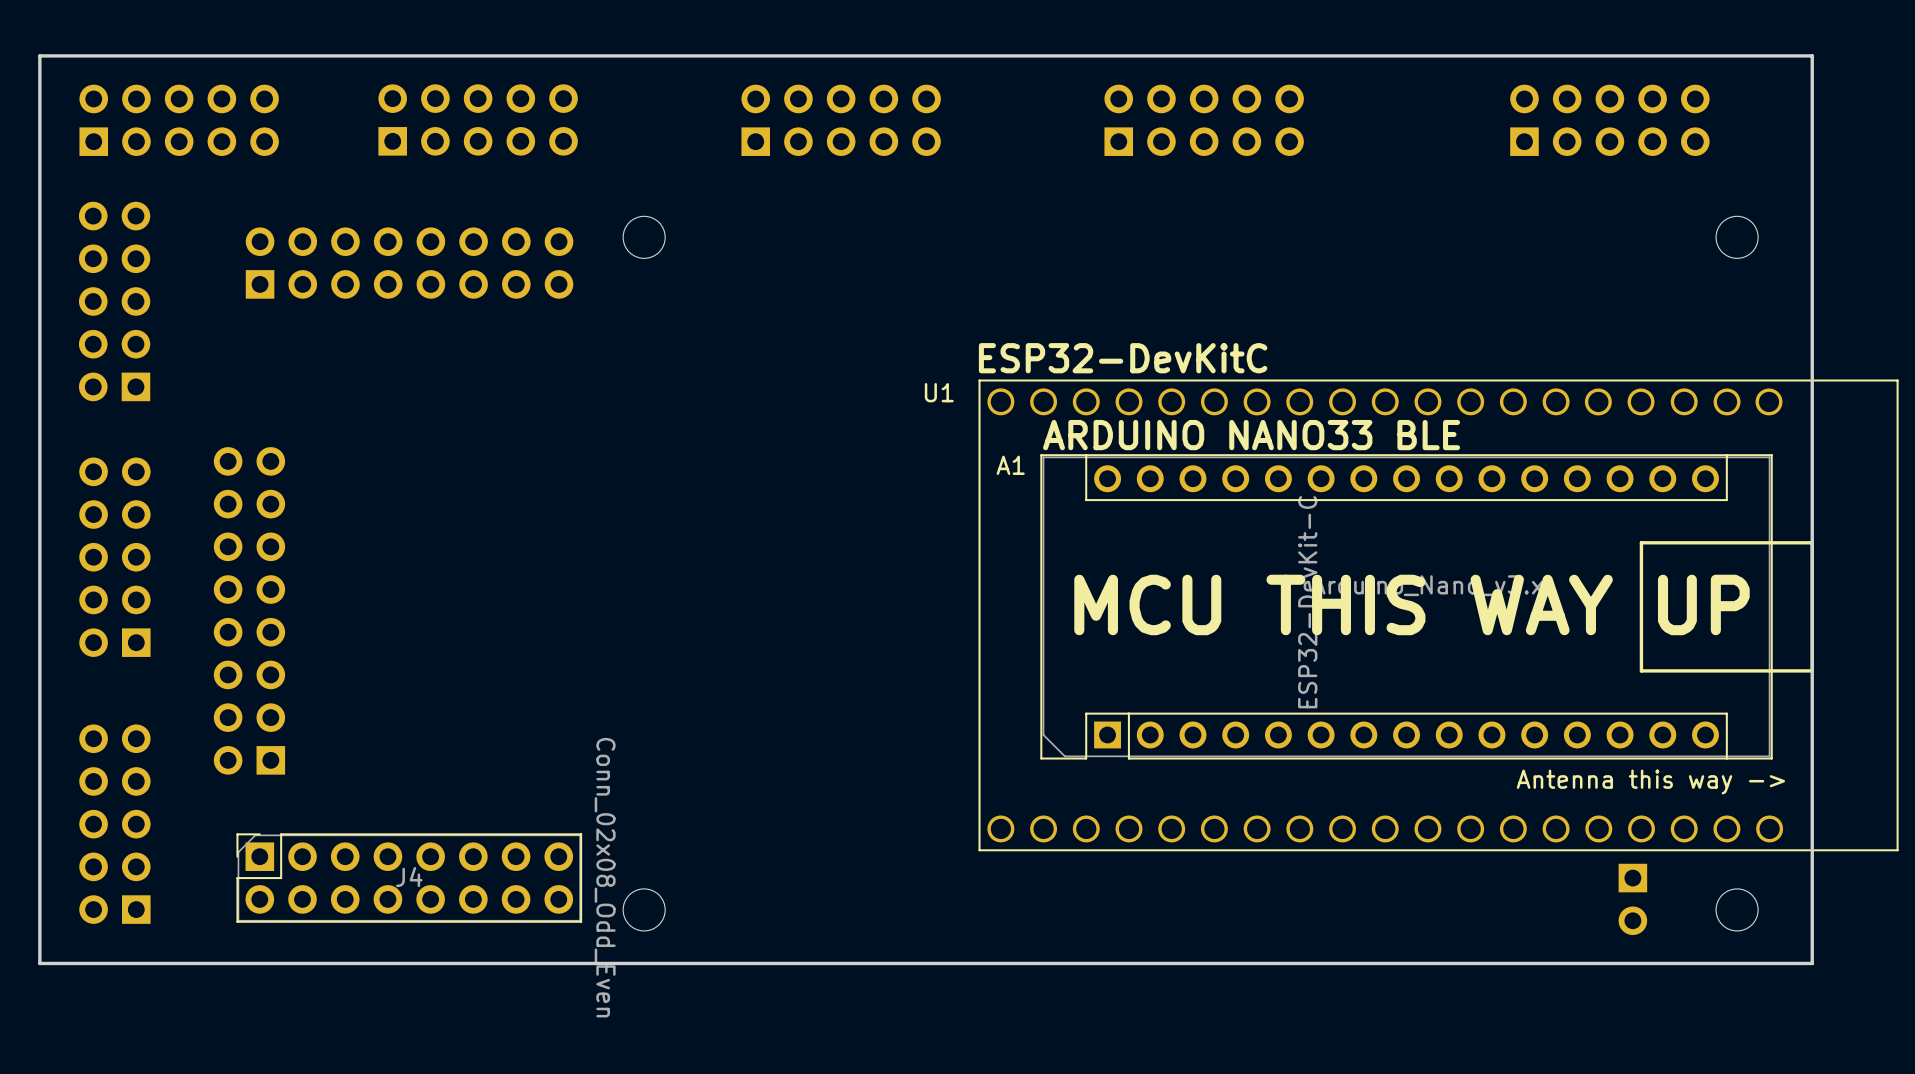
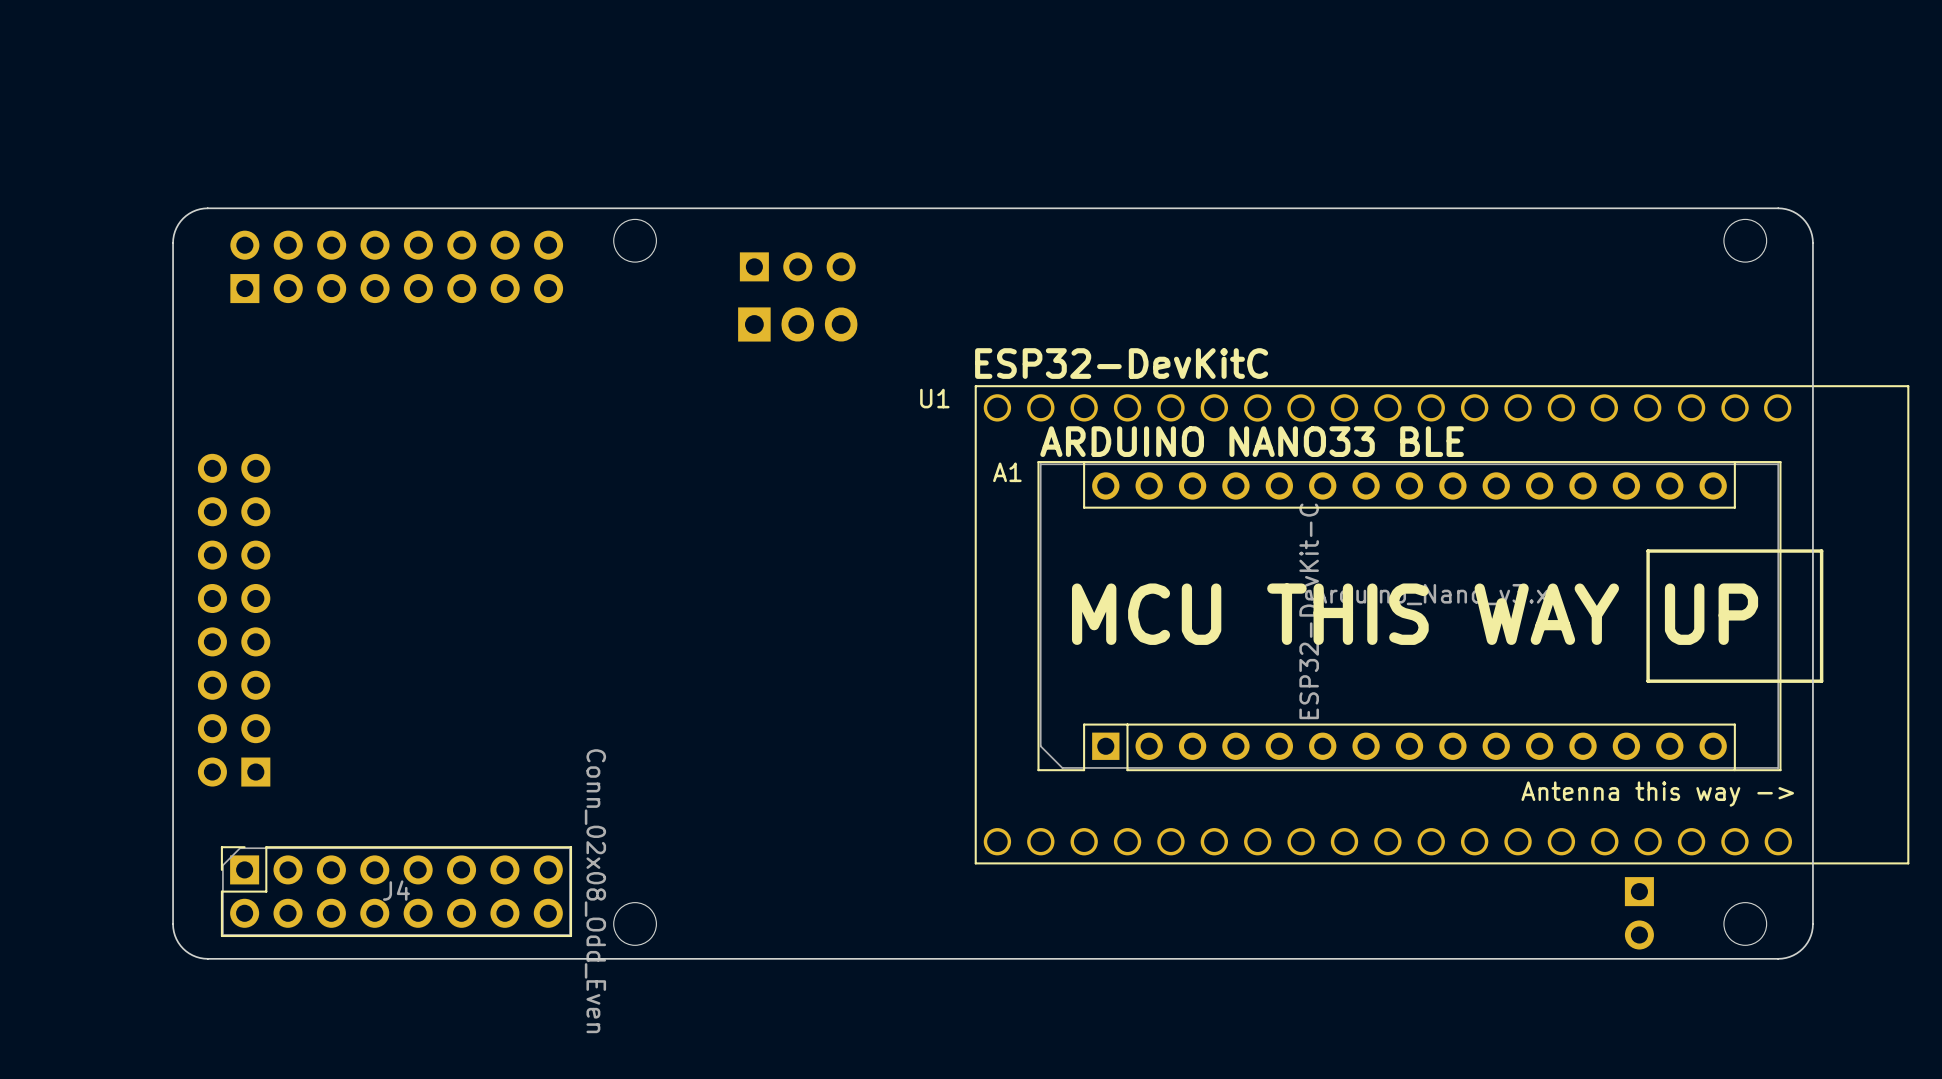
board edge: (1812, 55) (1812, 963) (39, 963) (39, 55) (1812, 55) -> (1778, 208) (1793, 211) (1802, 218) (1811, 231) (1812, 243) (1812, 924) (1807, 942) (1793, 955) (1778, 958) (207, 958) (189, 953) (176, 939) (173, 924) (173, 243) (178, 224) (192, 211) (207, 208) (1778, 208)
part: (478, 119) -> none
part: (179, 120) -> none
part: (841, 120) -> none
part: (1204, 120) -> none
part: (1609, 120) -> none
part: none -> (797, 266)
part: (114, 301) -> none
part: none -> (797, 324)
part: (114, 557) -> none
part: (114, 824) -> none

